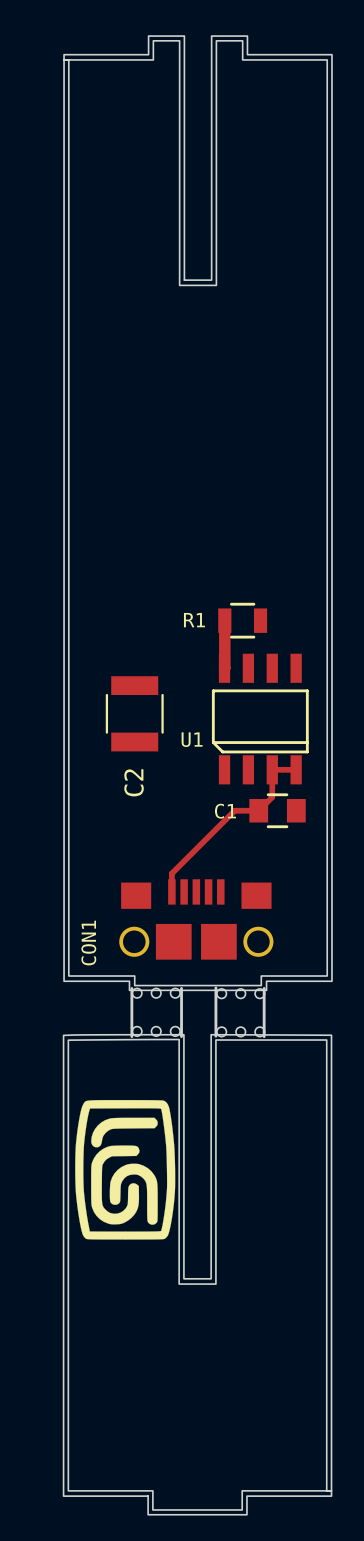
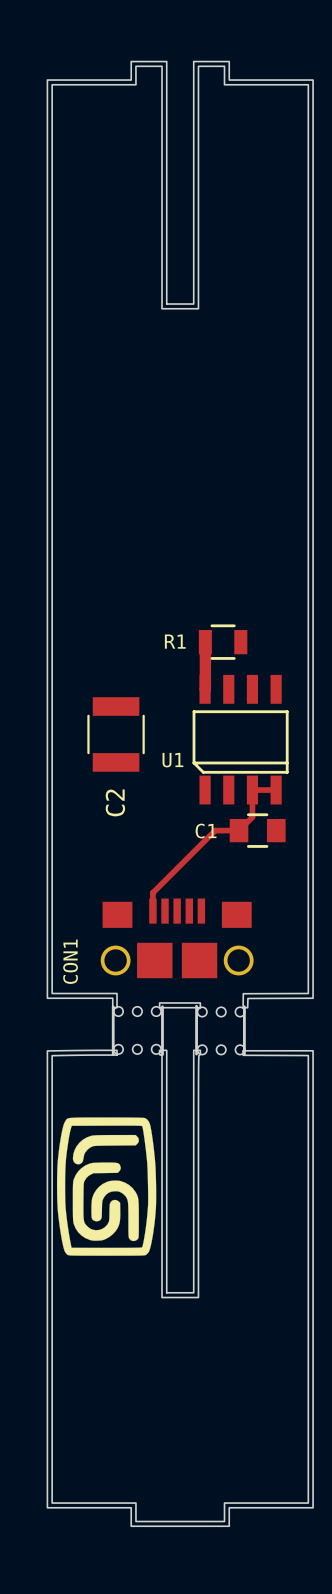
drawing: [63, 35, 333, 991] -> none
drawing: none -> [47, 61, 314, 1527]
drawing: [63, 1034, 332, 1515] -> none

